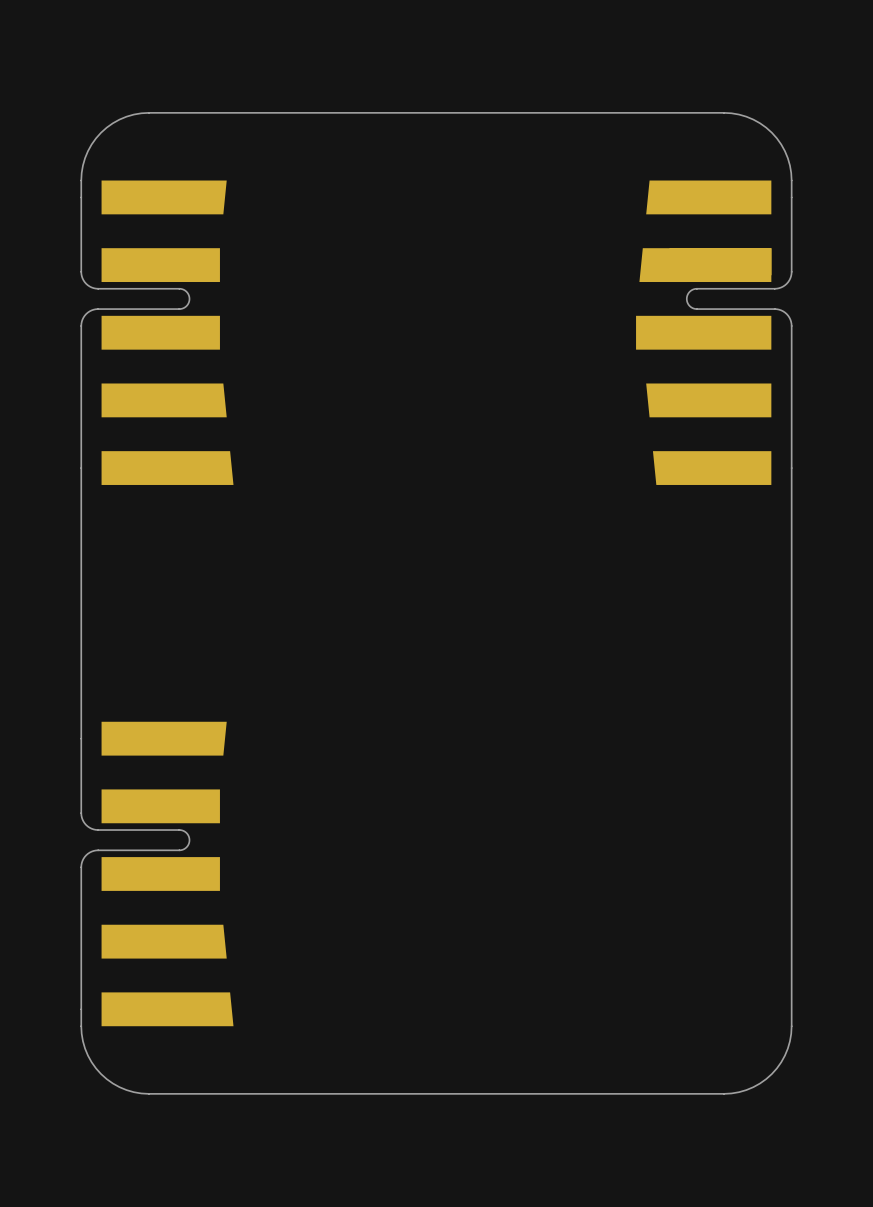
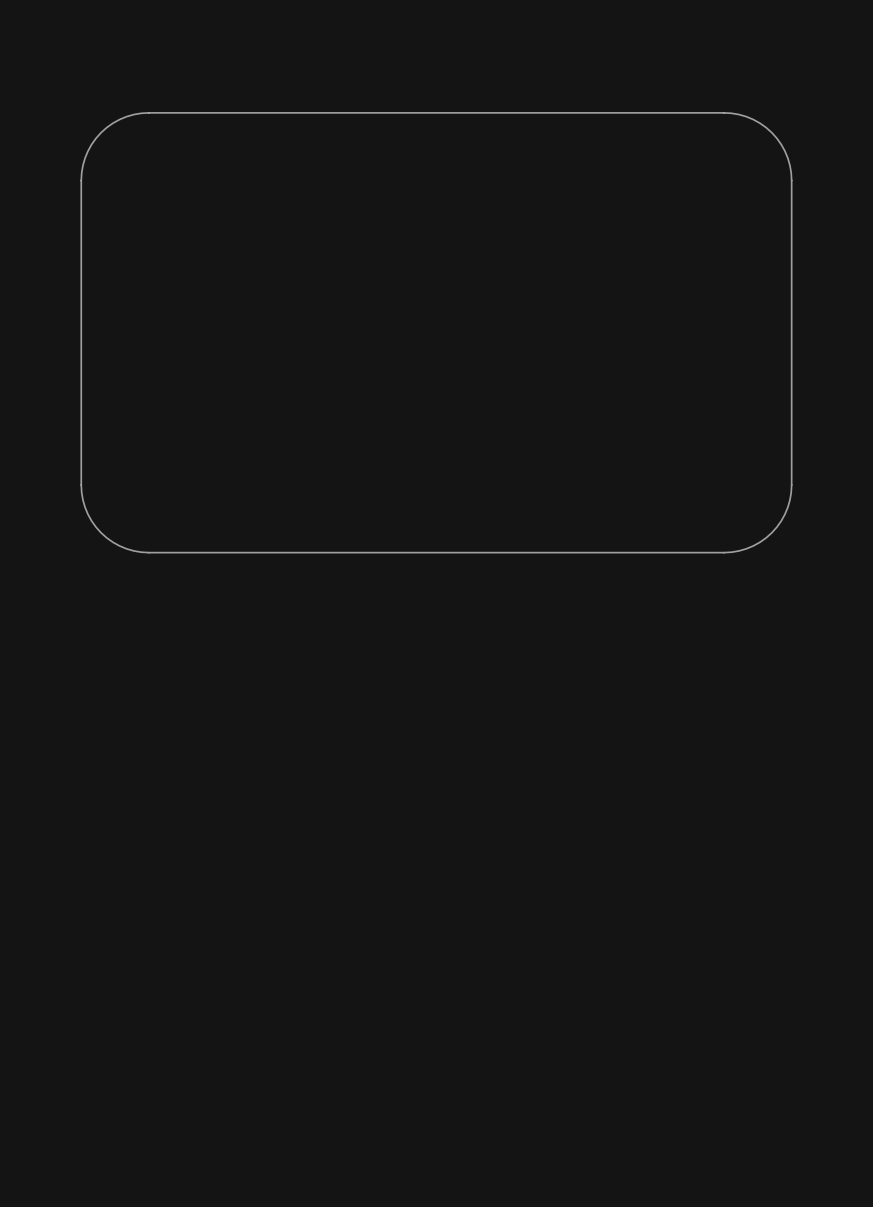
board edge: none -> (81, 197) (81, 468)
board edge: none -> (791, 197) (791, 468)
part: (156, 332) -> none
part: (714, 332) -> none
board edge: (81, 484) (81, 738) -> none
board edge: (791, 484) (791, 1026) (789, 1041) (784, 1055) (776, 1068) (766, 1079) (746, 1090) (723, 1093) (141, 1093) (119, 1087) (106, 1079) (96, 1068) (87, 1055) (82, 1041) (81, 1009) -> (791, 484) (789, 500) (784, 514) (771, 532) (759, 542) (746, 548) (723, 552) (141, 552) (119, 545) (106, 537) (96, 527) (85, 507) (81, 484)
part: (156, 873) -> none

